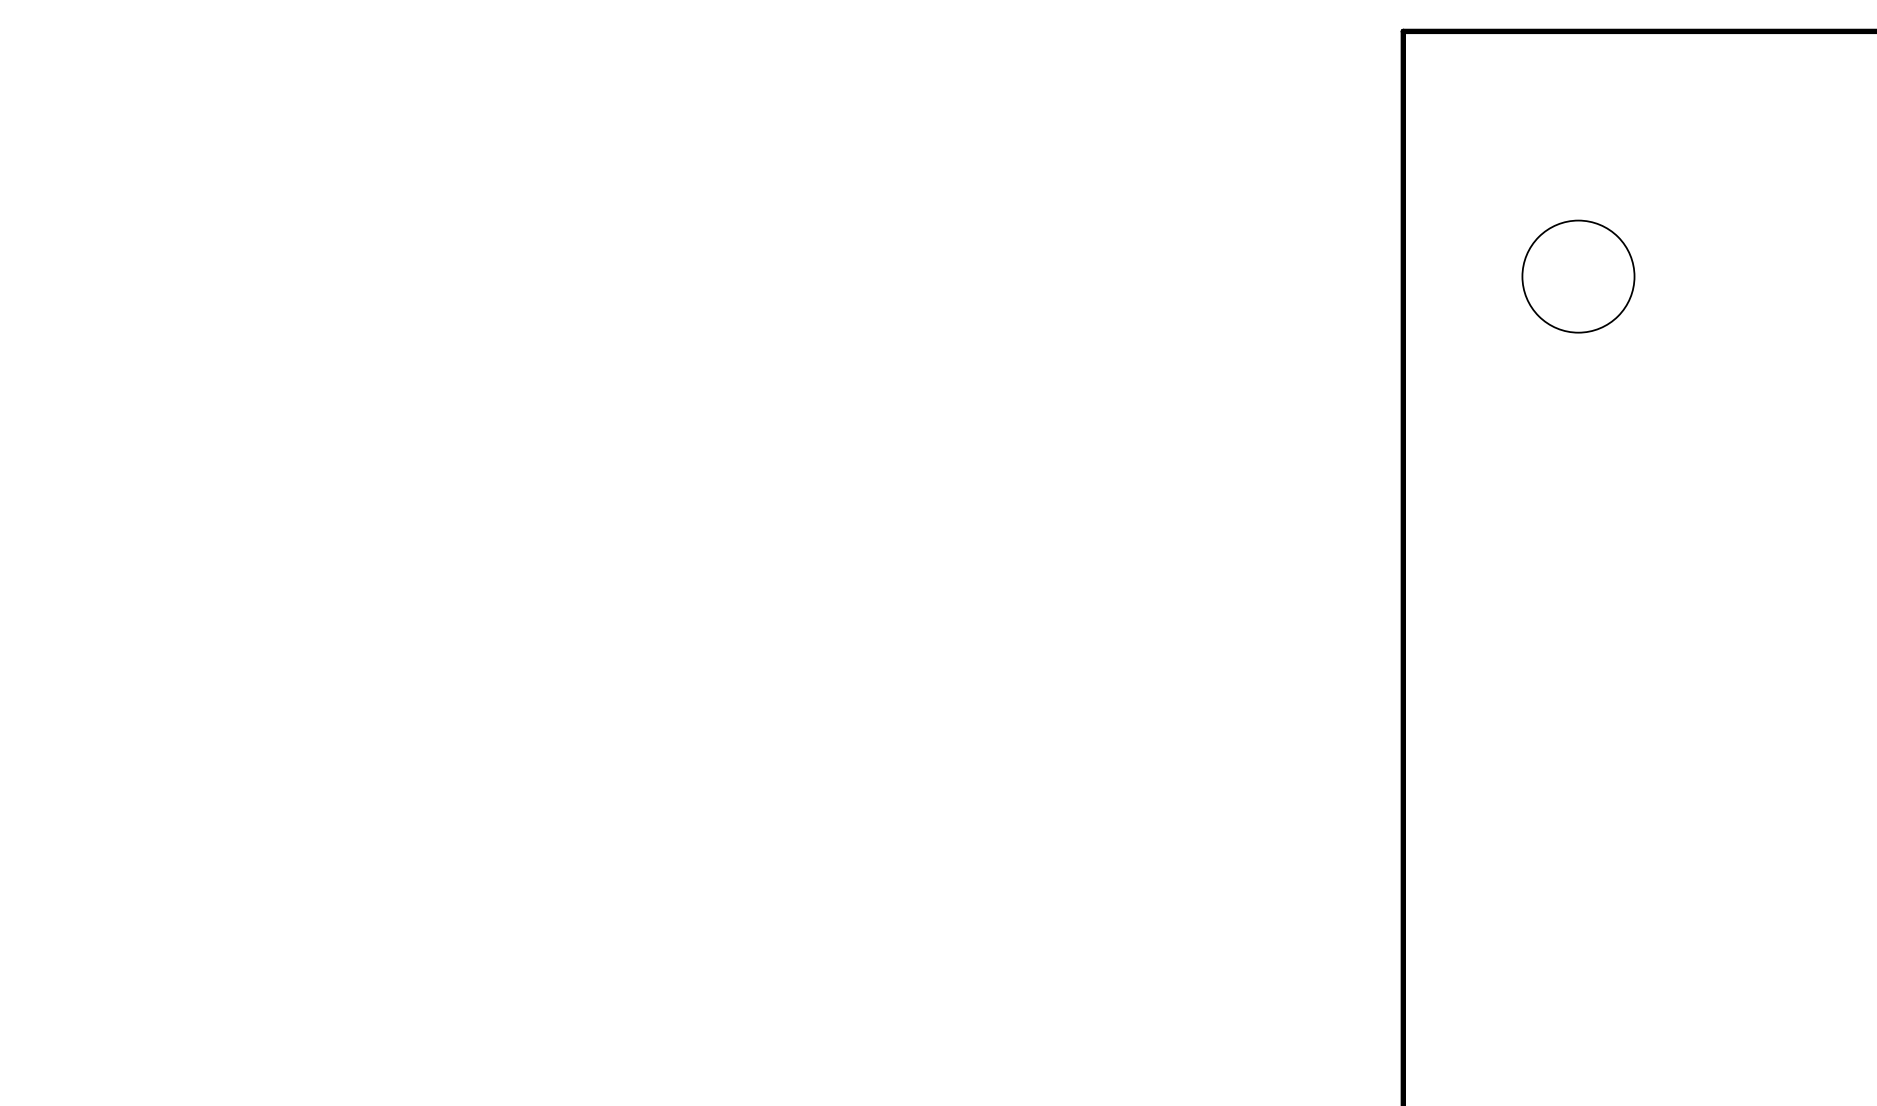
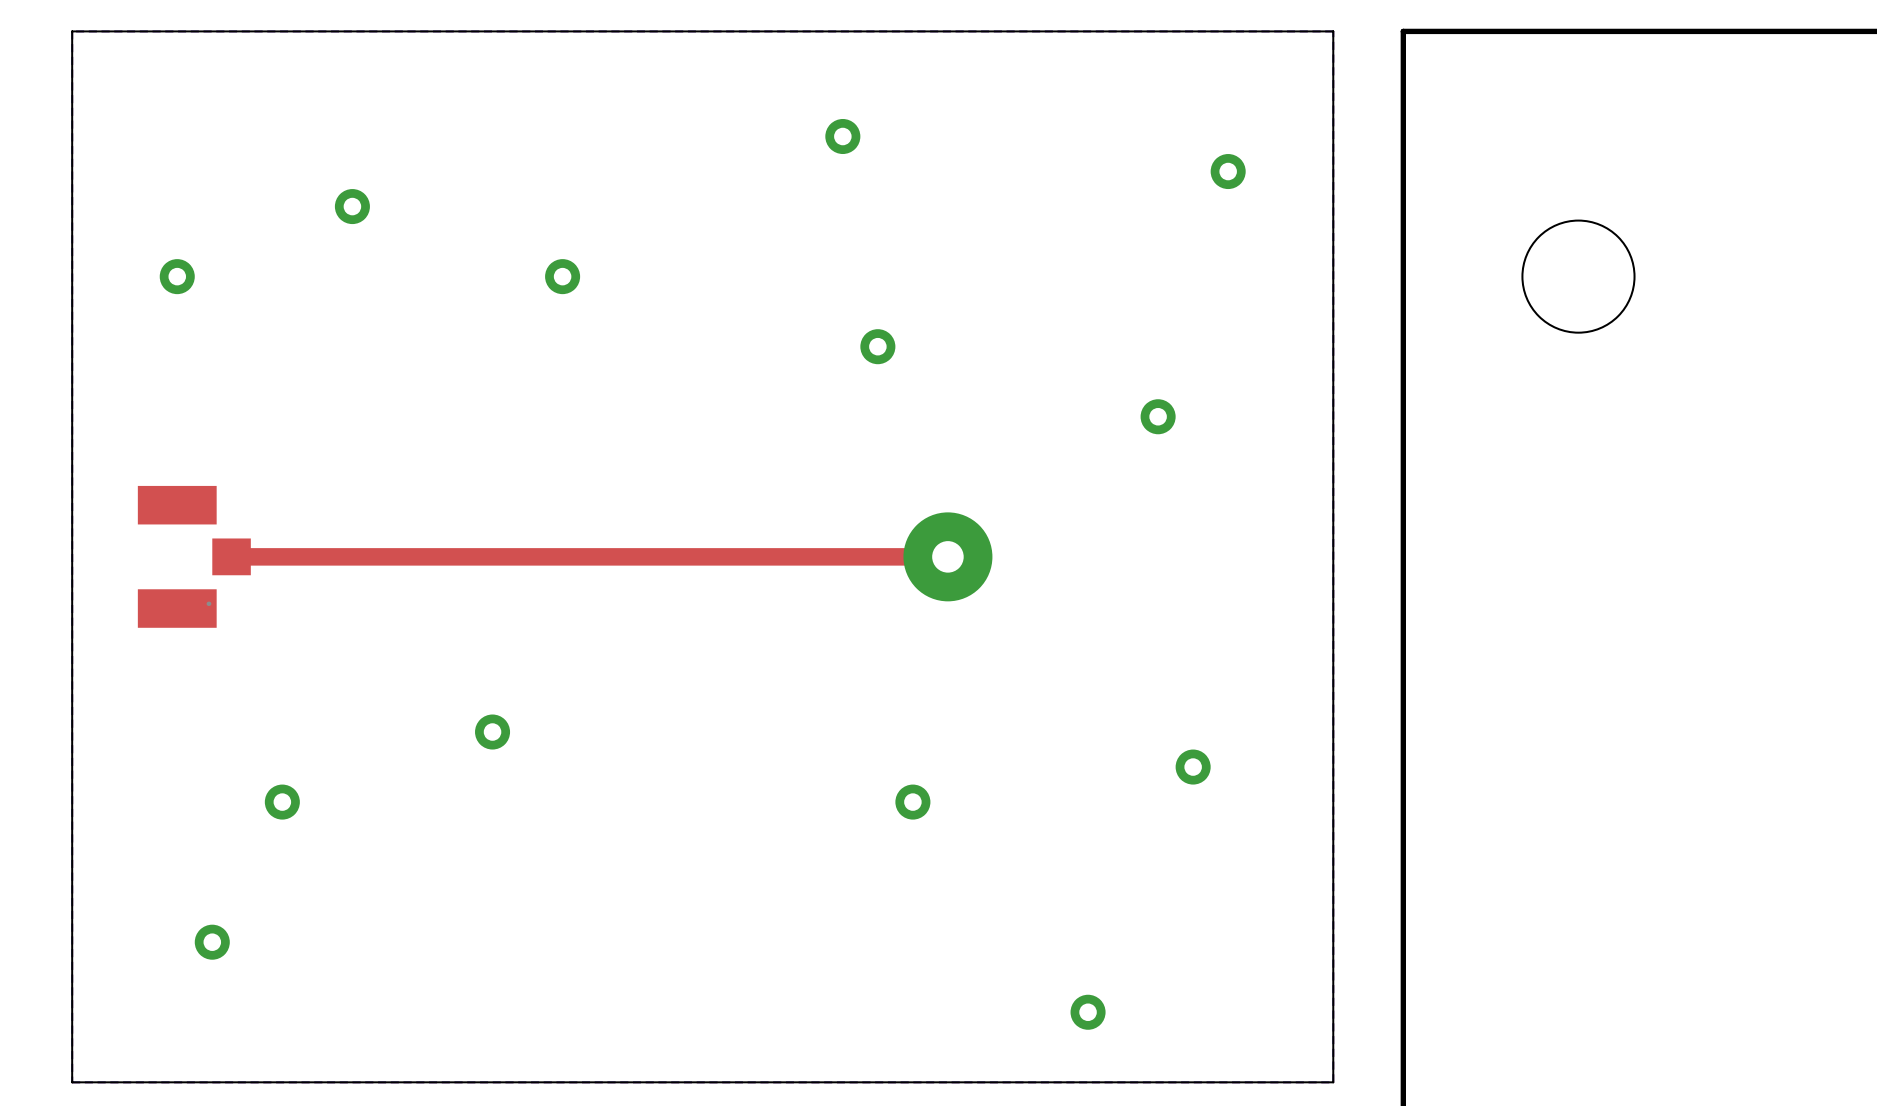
board edge: none -> (1333, 31) (72, 31) (72, 1082) (1333, 1082) (1333, 31)
via: none -> (842, 136)
via: none -> (1228, 171)
via: none -> (352, 206)
via: none -> (177, 276)
via: none -> (562, 276)
via: none -> (877, 346)
via: none -> (1158, 416)
part: none -> (194, 556)
top track: none -> (947, 556) (231, 556)
part: none -> (947, 556)
via: none -> (492, 732)
via: none -> (1193, 767)
via: none -> (282, 802)
via: none -> (912, 802)
via: none -> (212, 942)
via: none -> (1088, 1012)

